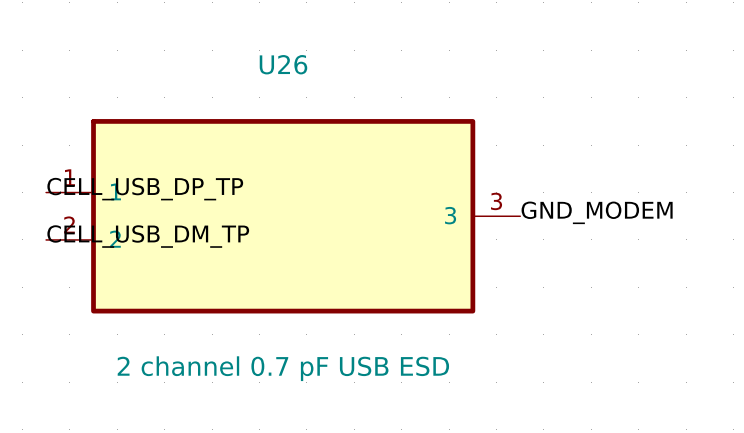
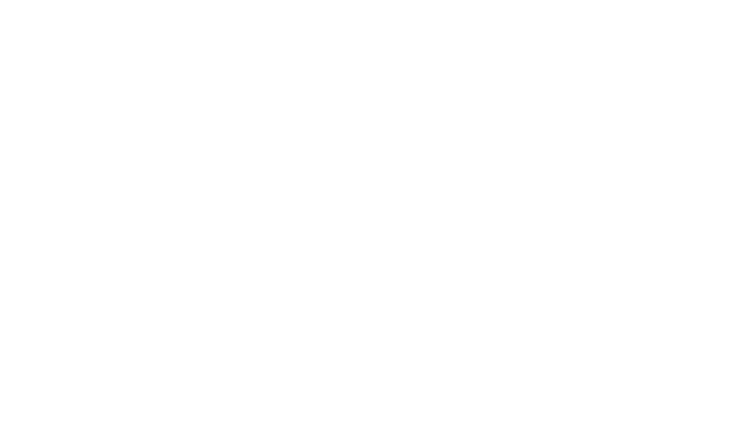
label: CELL_USB_DP_TP (145, 189) -> none
label: GND_MODEM (597, 212) -> none
U26: 2 channel 0.7 pF USB ESD (283, 216) -> none
label: CELL_USB_DM_TP (148, 236) -> none

